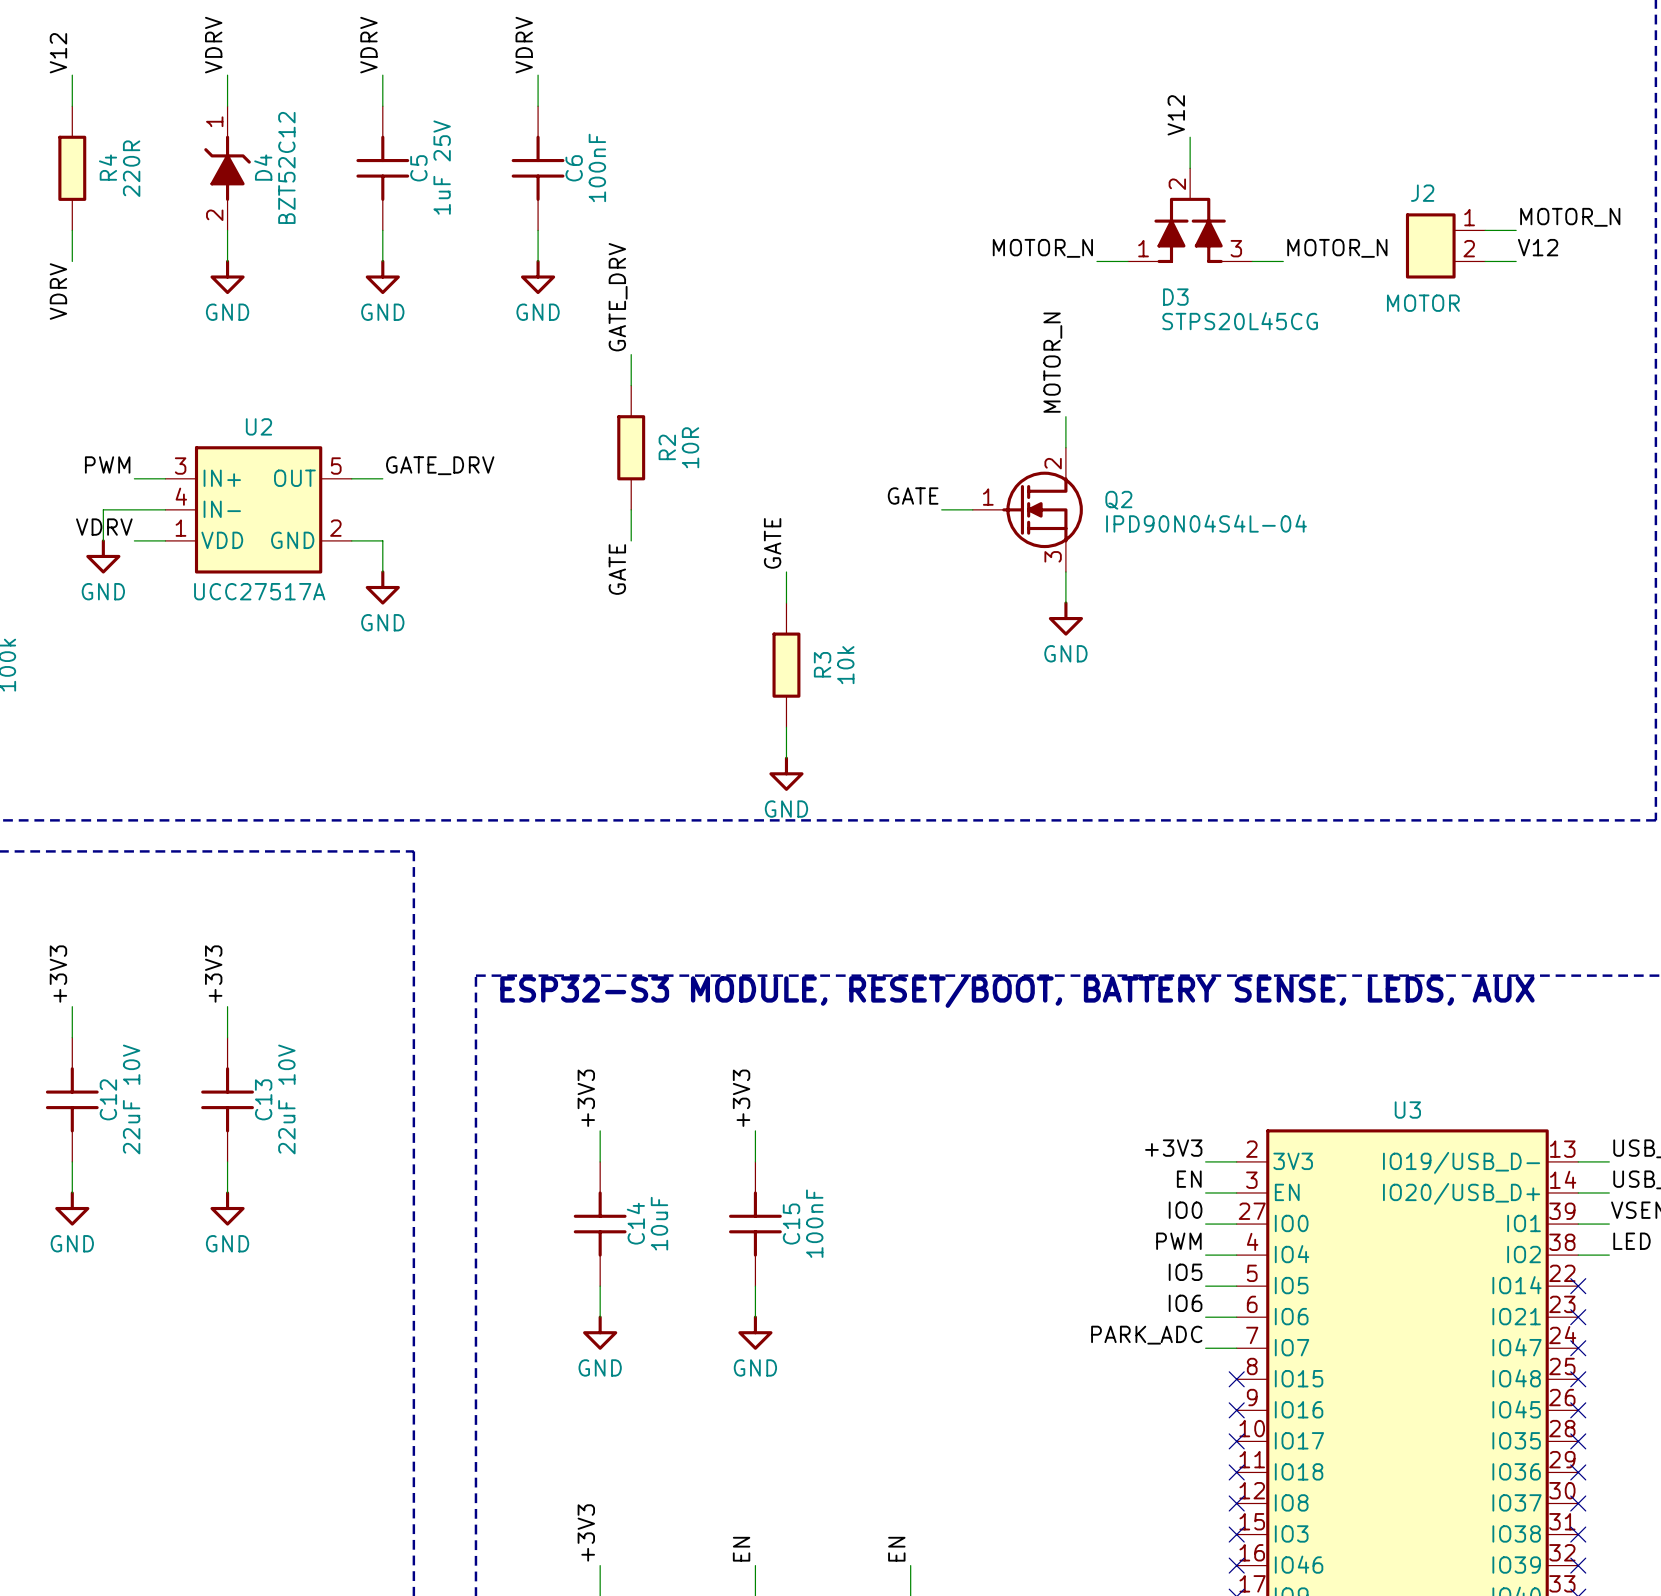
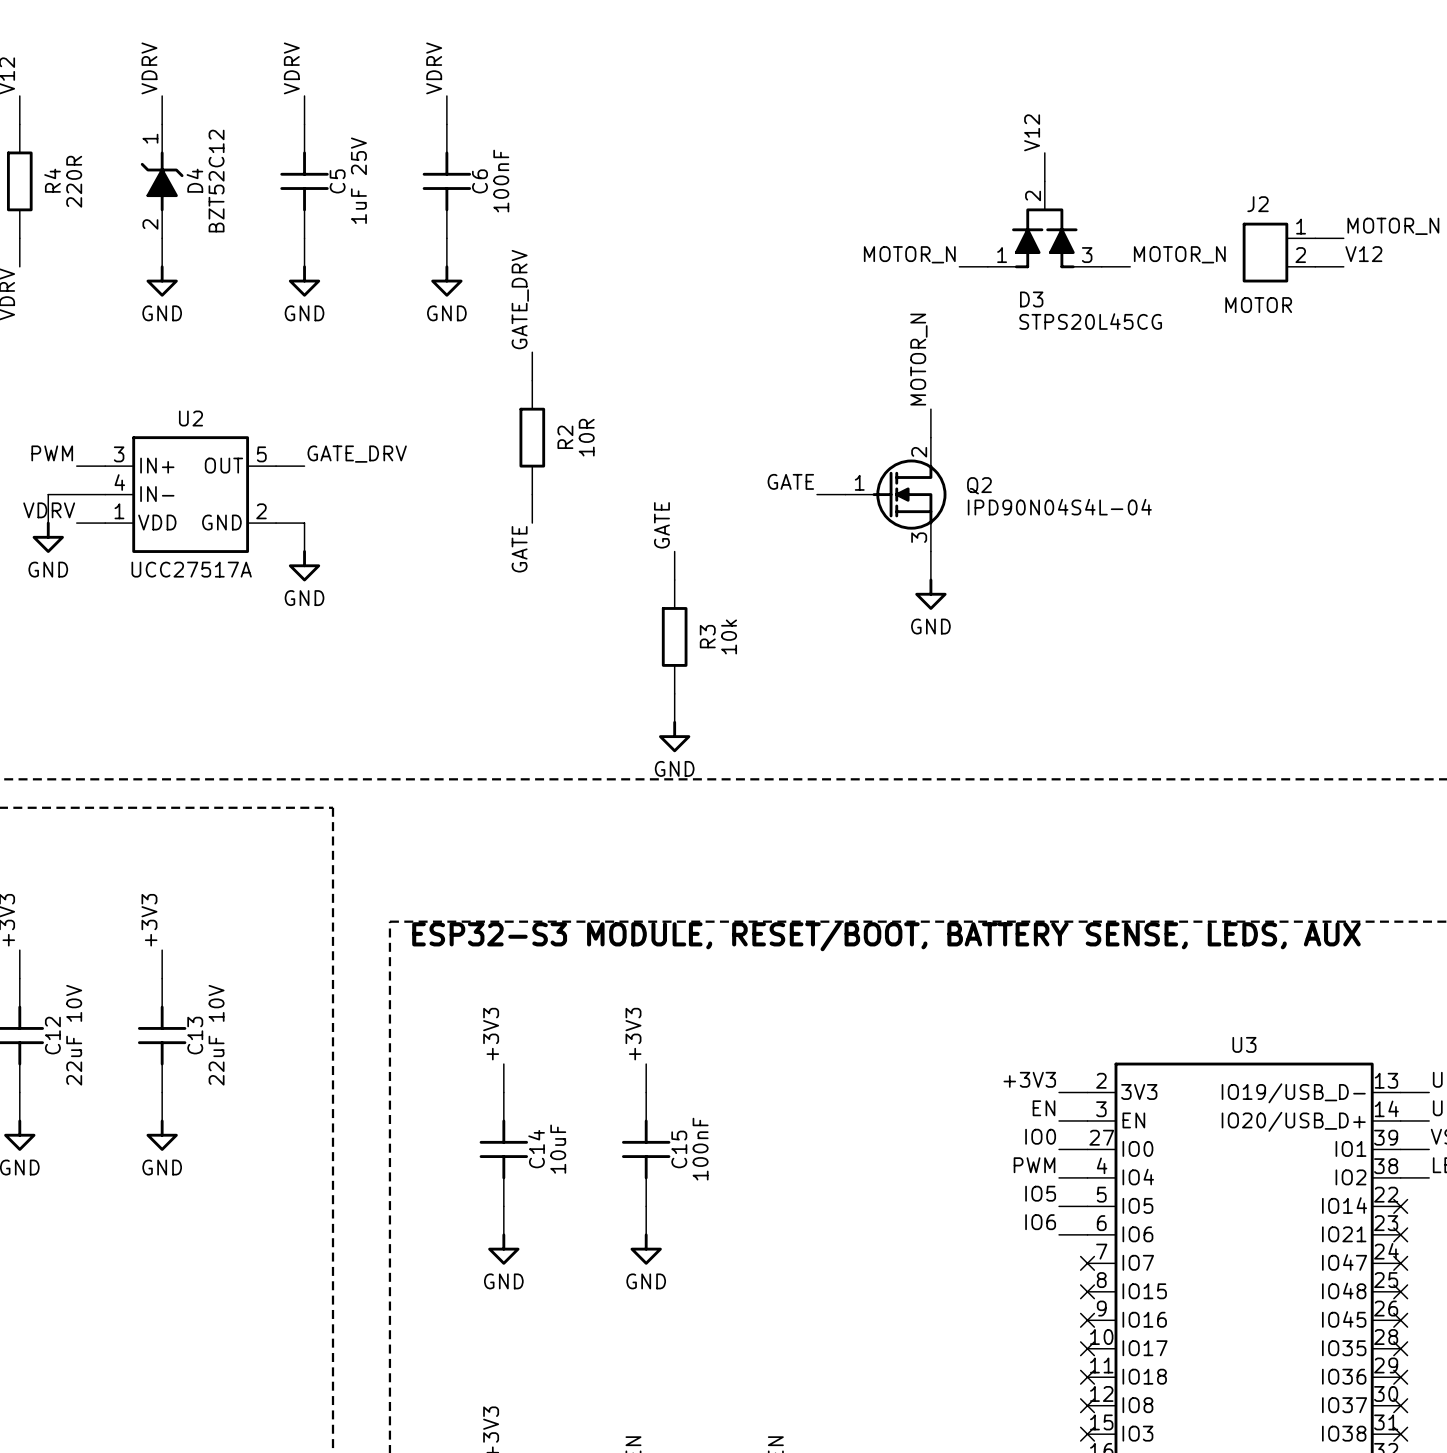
label: PARK_ADC (1146, 1335) -> none
wire: (1205, 1348) (1236, 1348) -> none
no-connect mark: none -> (1087, 1263)

